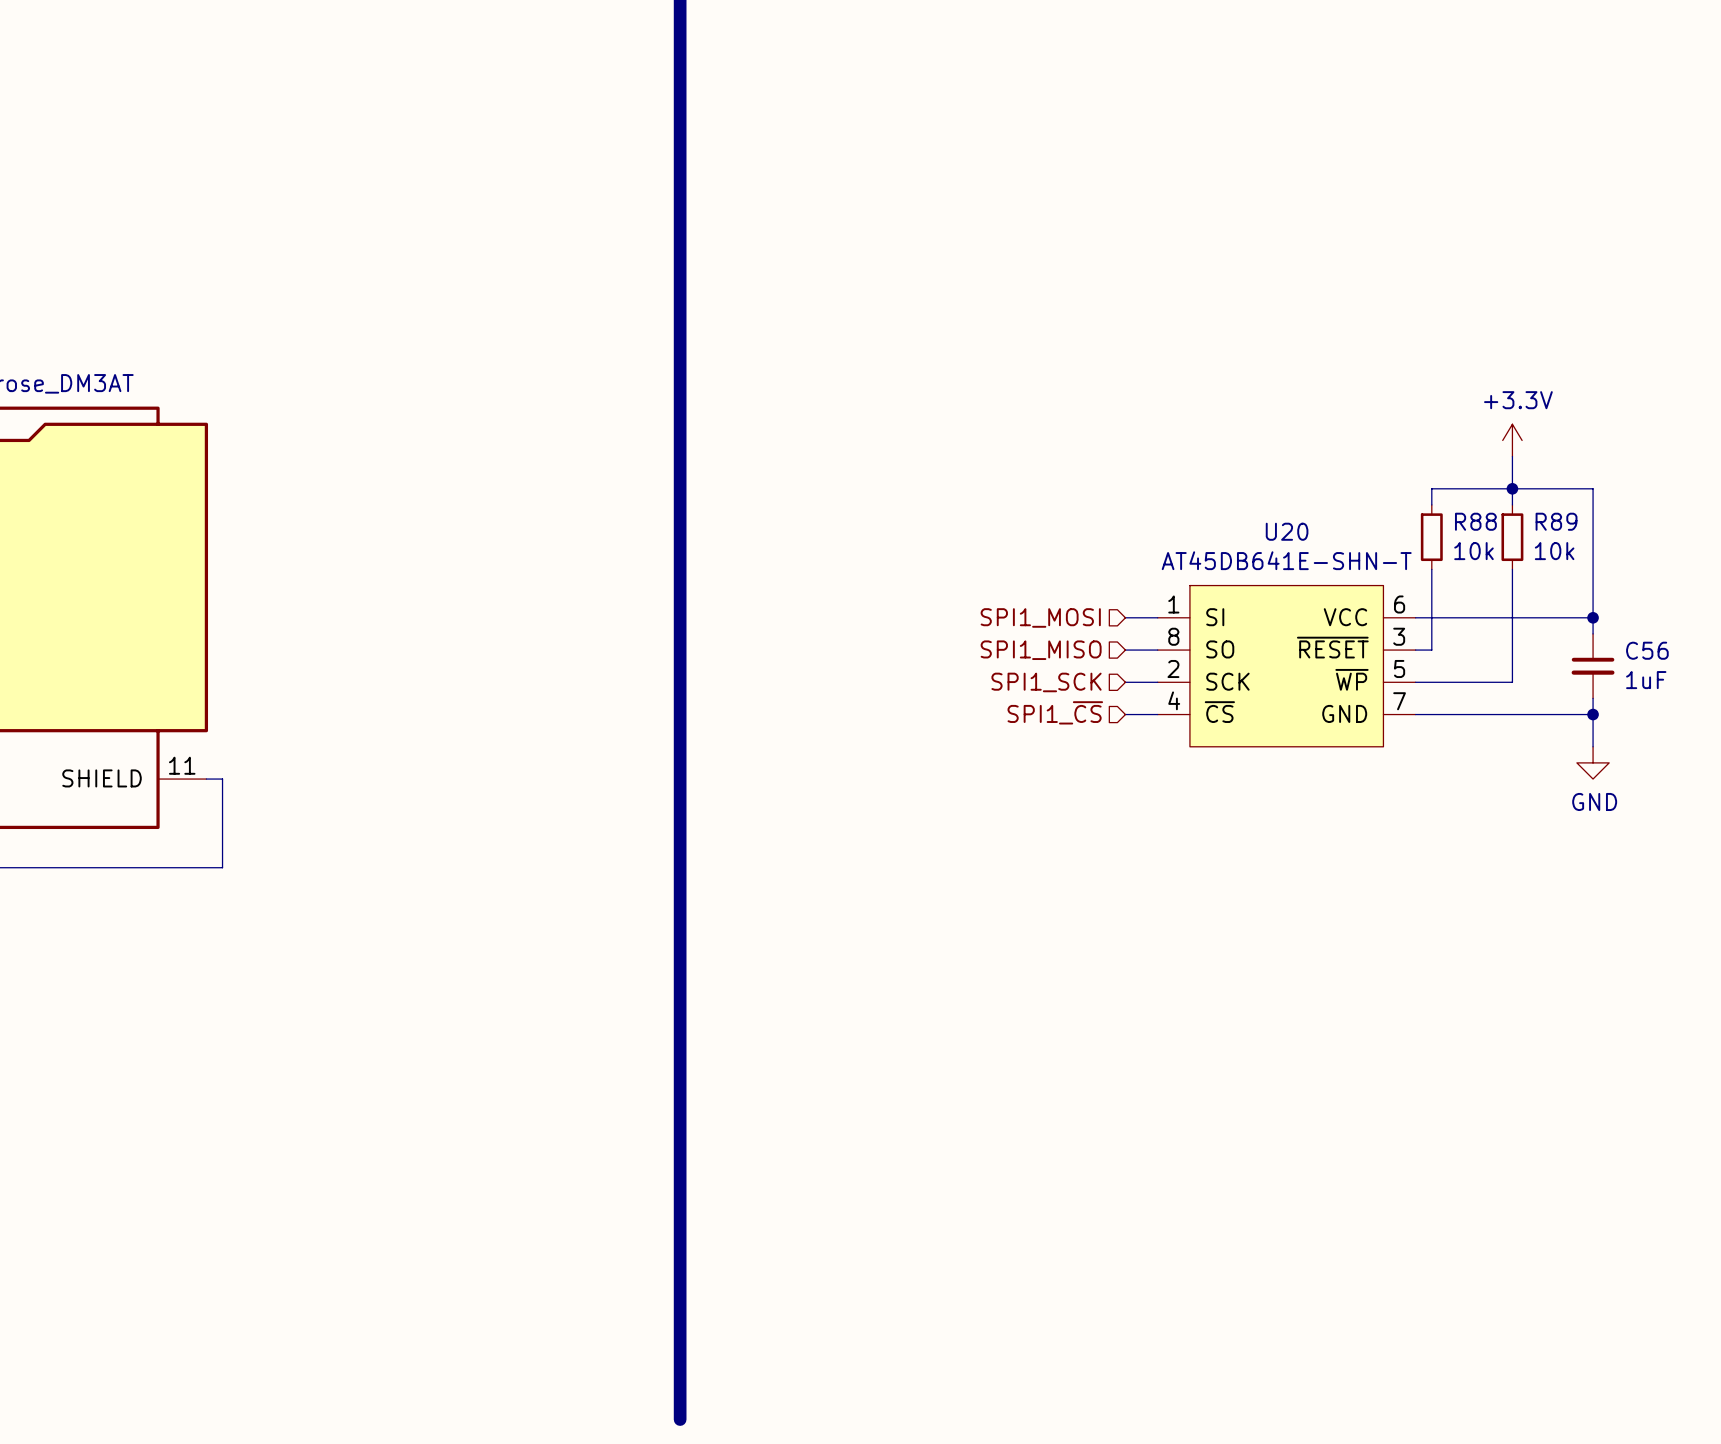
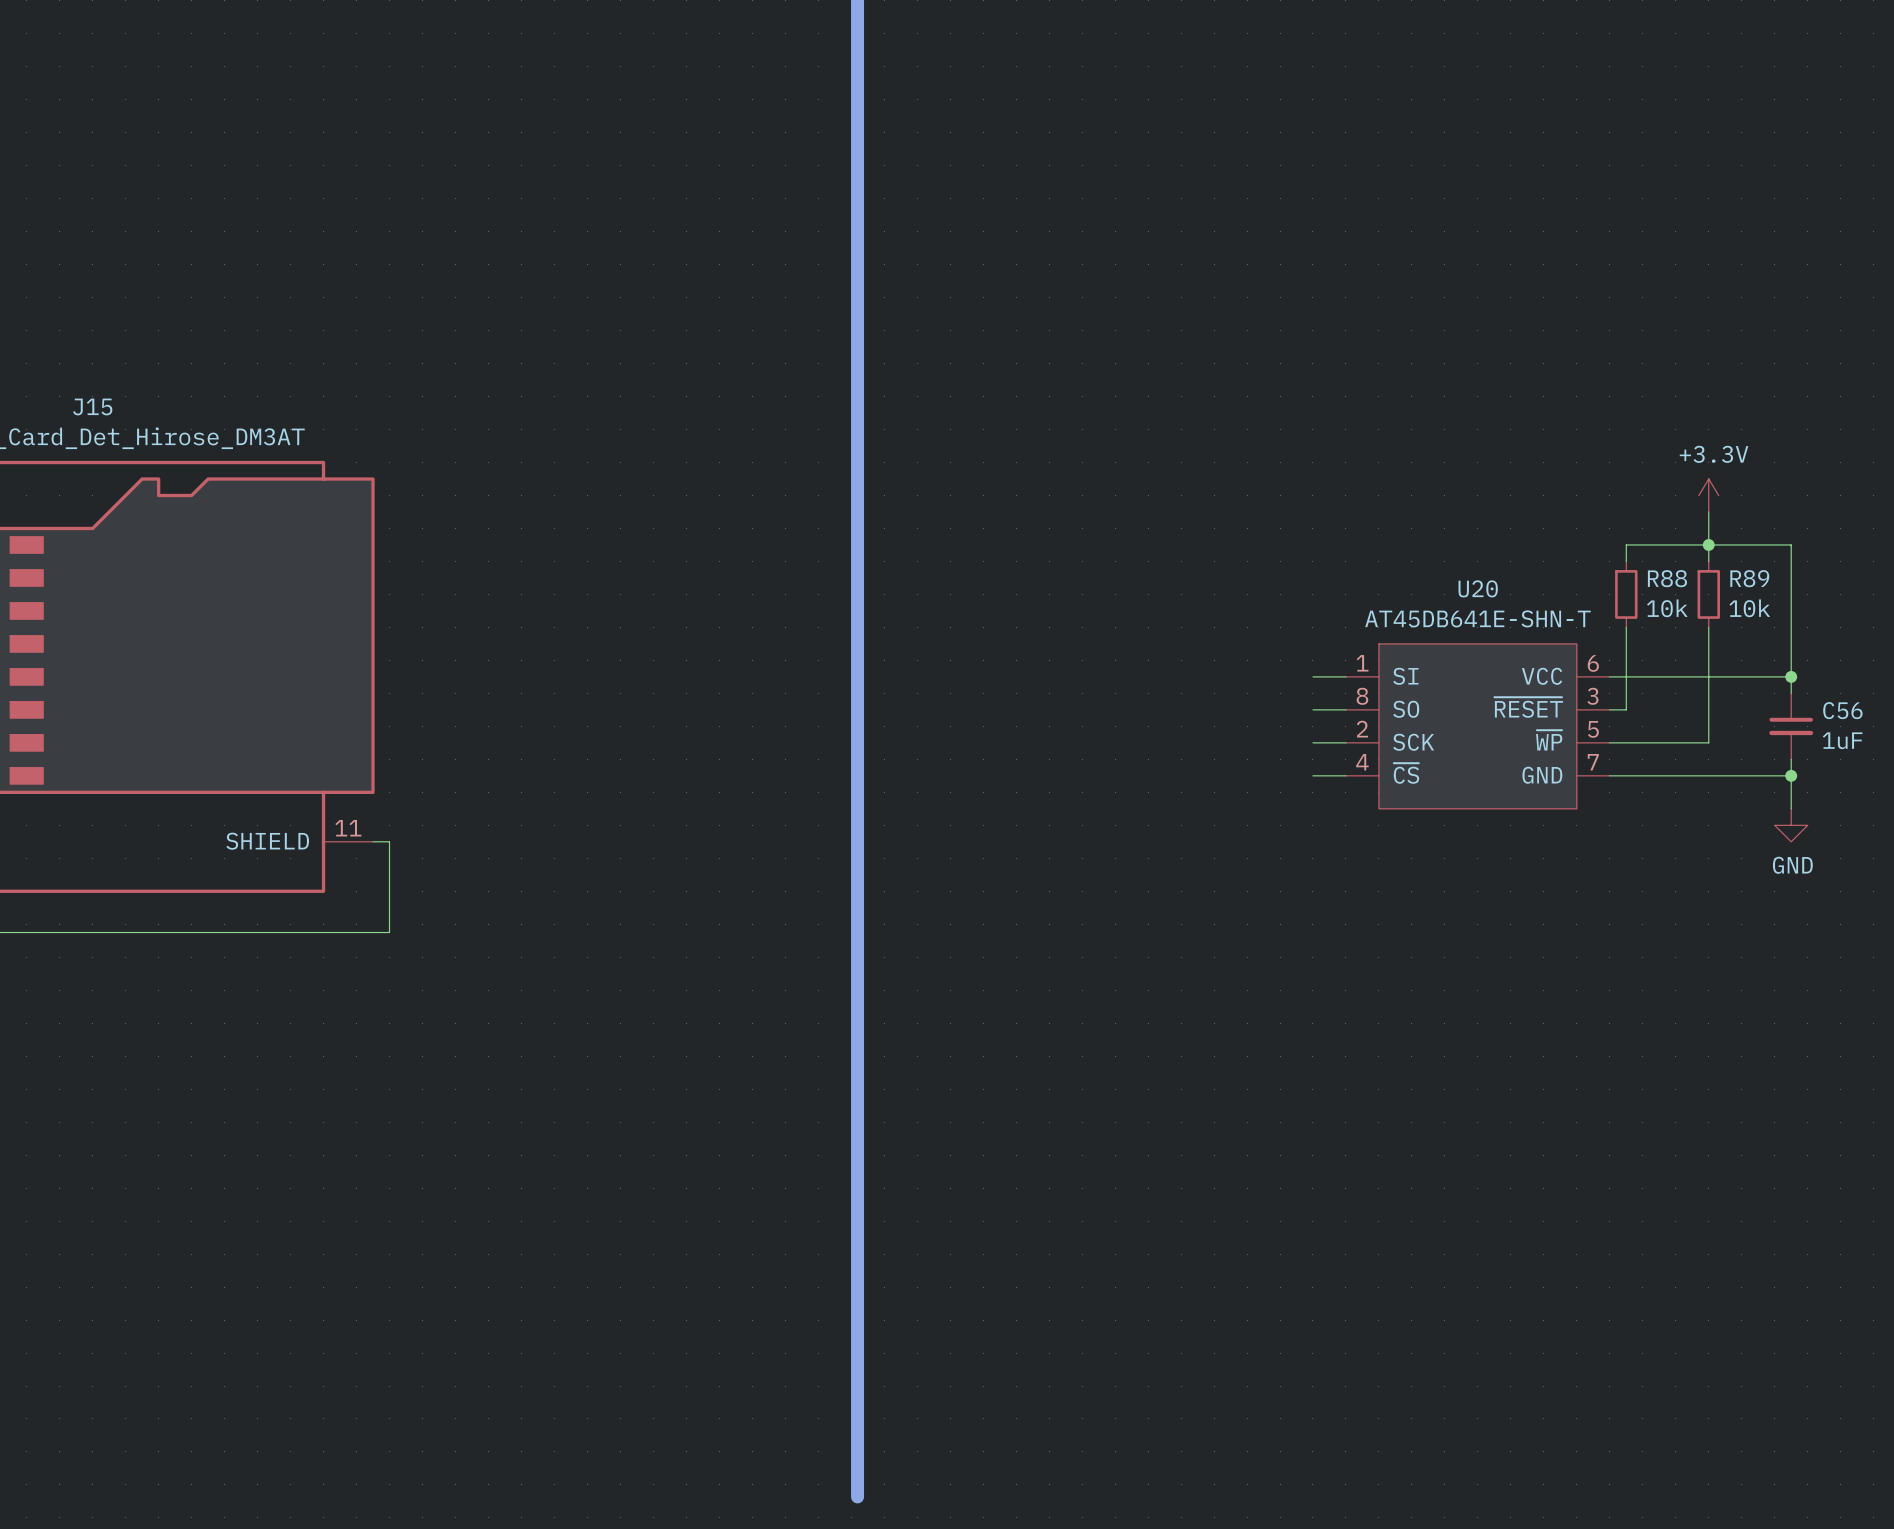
hierarchical label: SPI1_MOSI (1040, 617) -> none
hierarchical label: SPI1_MISO (1041, 650) -> none
hierarchical label: SPI1_SCK (1046, 682) -> none
hierarchical label: SPI1_~{CS} (1055, 712) -> none

